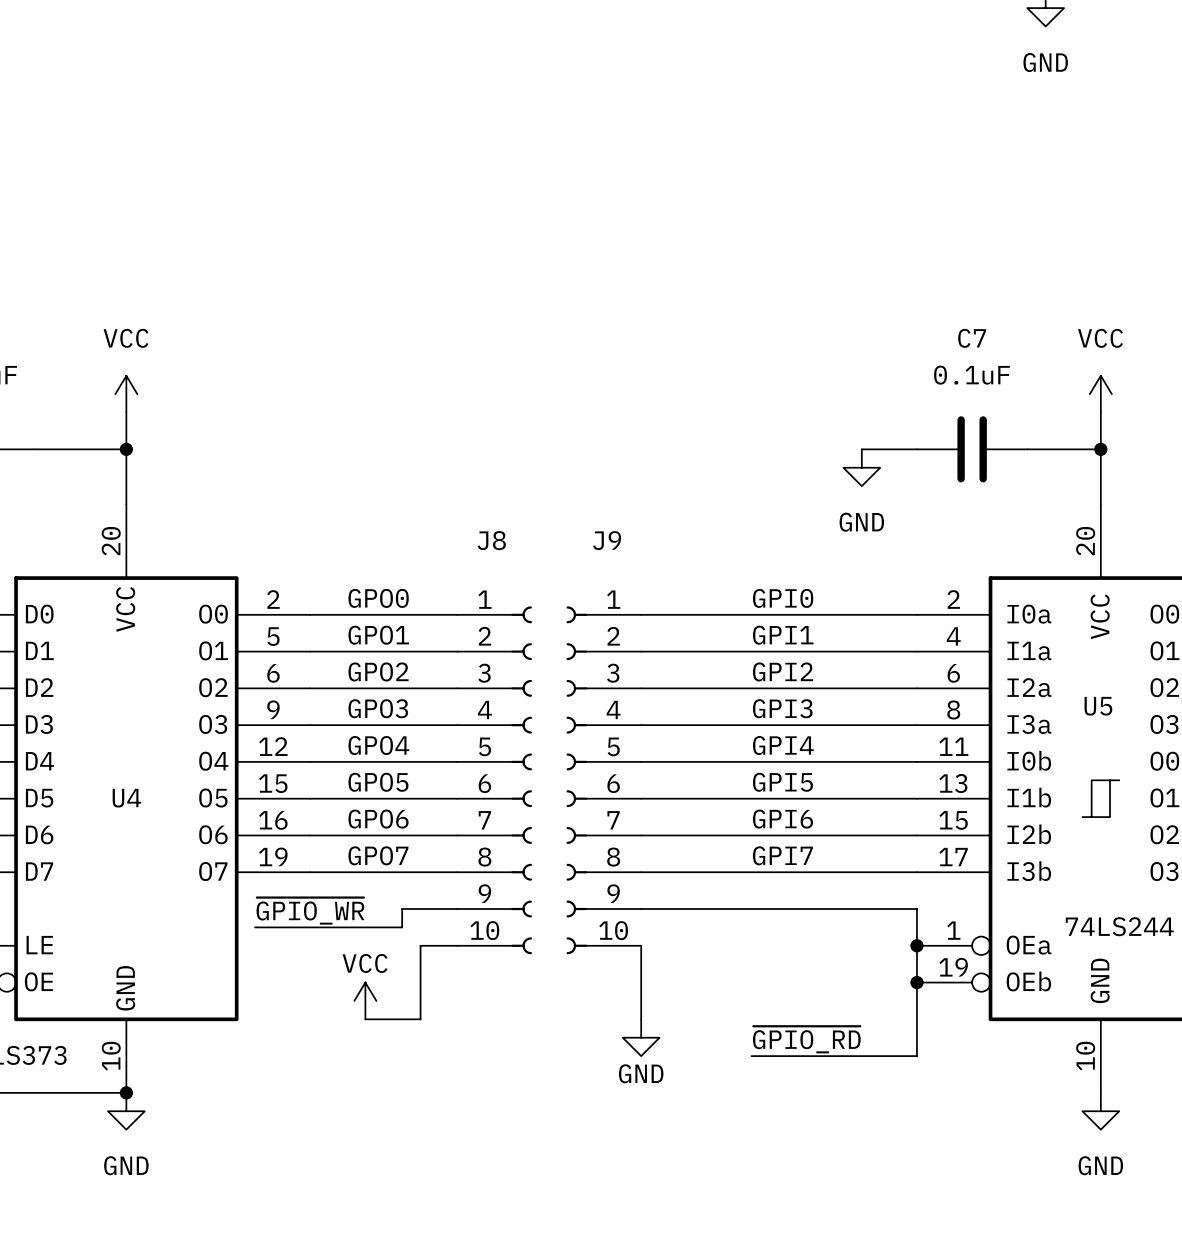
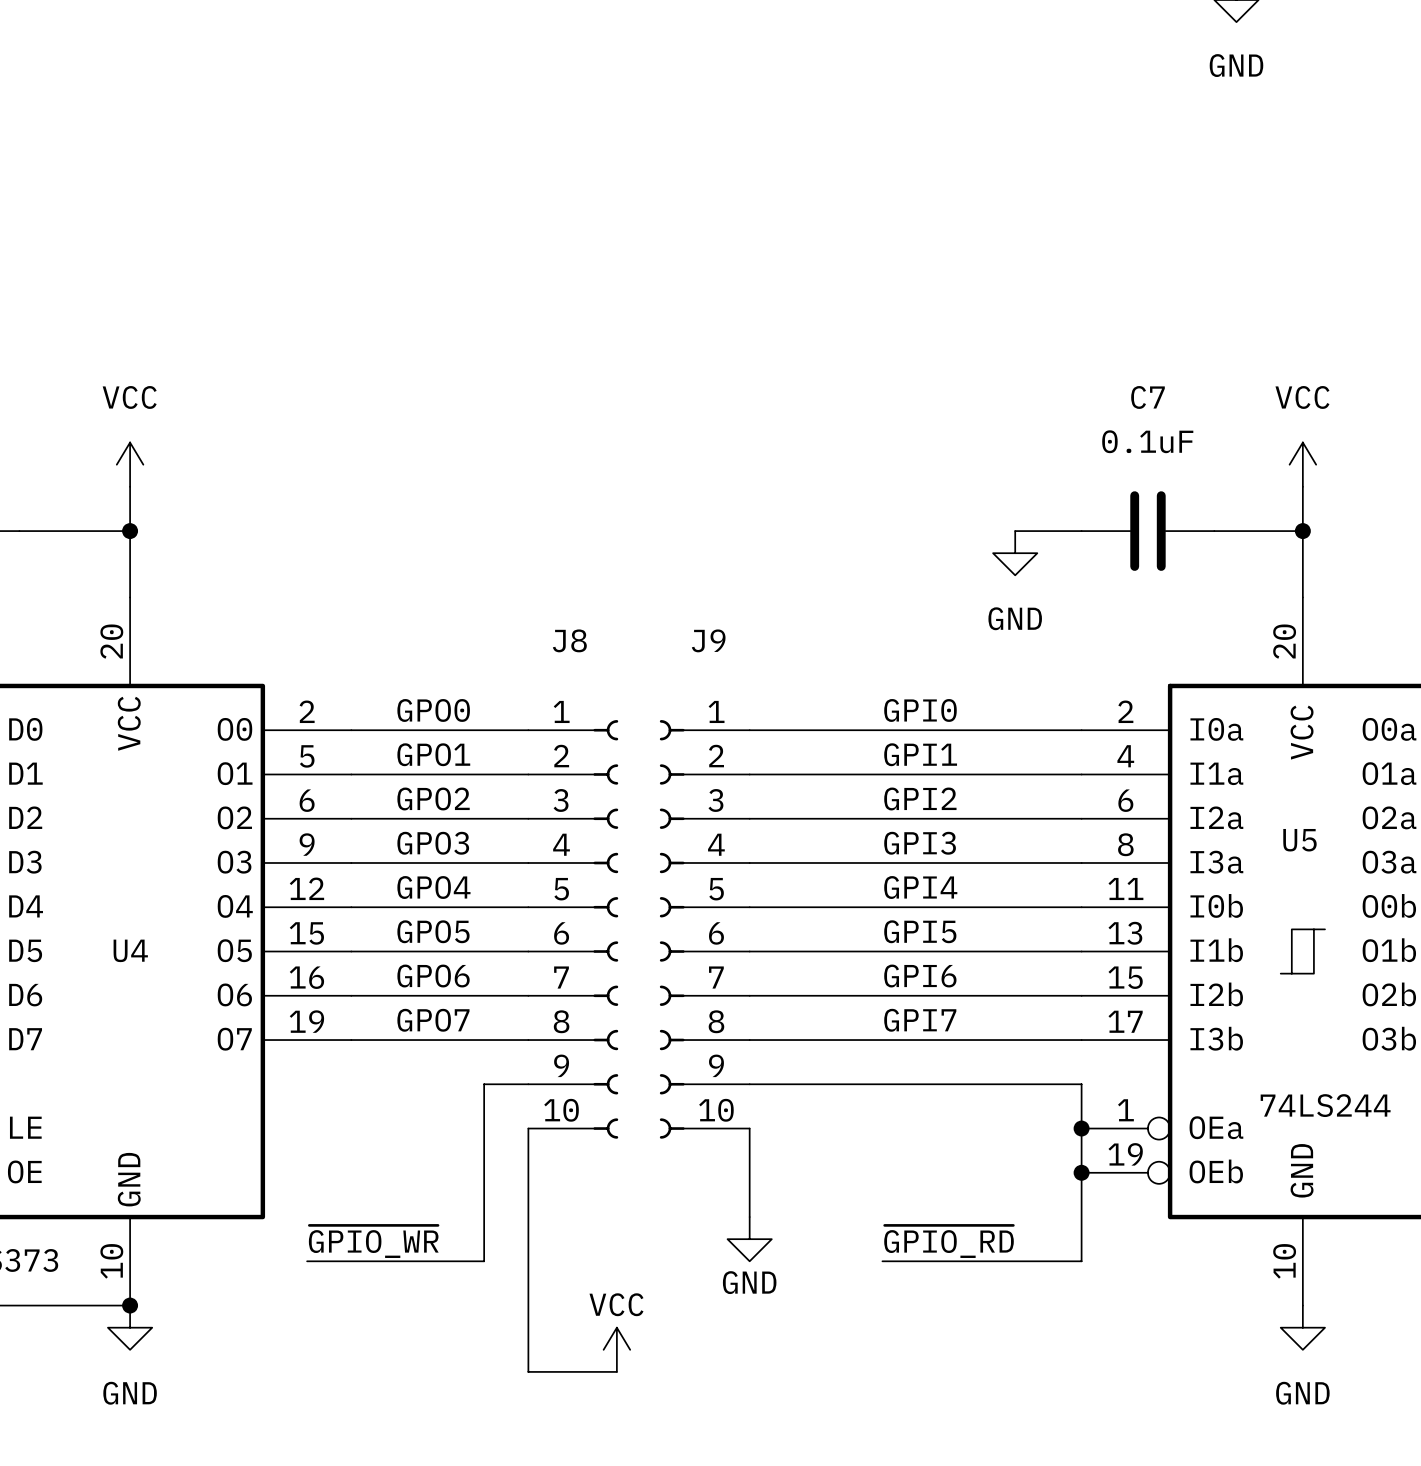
wire: (420, 909) (402, 909) (402, 927) (255, 927) -> none
label position: ~{GPIO_WR} (310, 911) -> ~{GPIO_WR} (373, 1241)
wire: (420, 945) (457, 945) -> (484, 1128) (484, 1084)
wire: none -> (528, 1128) (528, 1371) (616, 1371)
power symbol position: VCC (365, 1000) -> VCC (616, 1349)
wire: (365, 1019) (420, 1019) -> (307, 1261) (484, 1261) (484, 1217)

